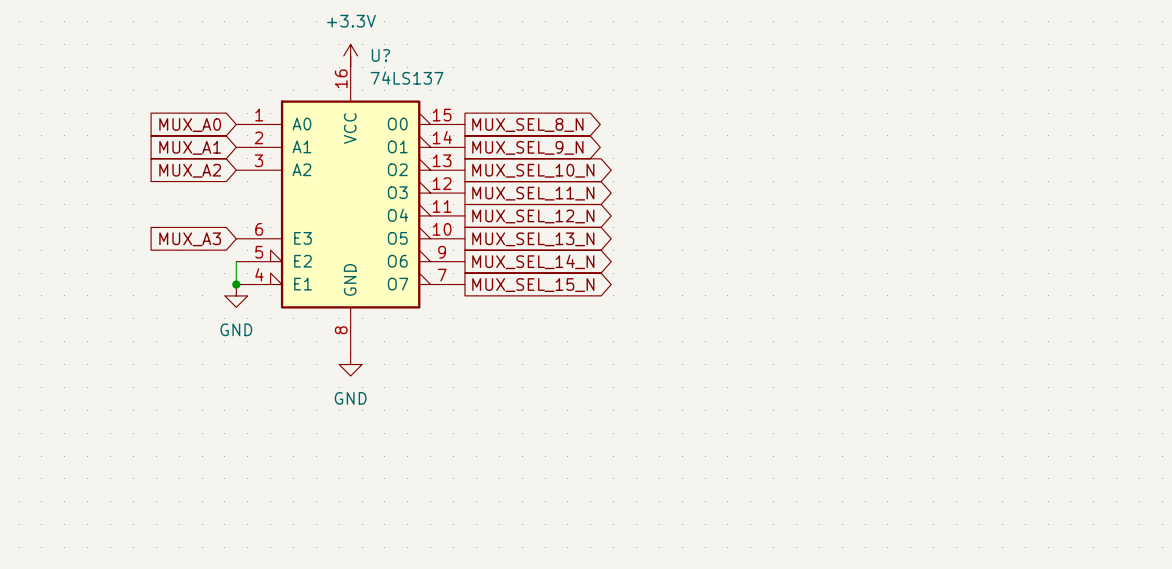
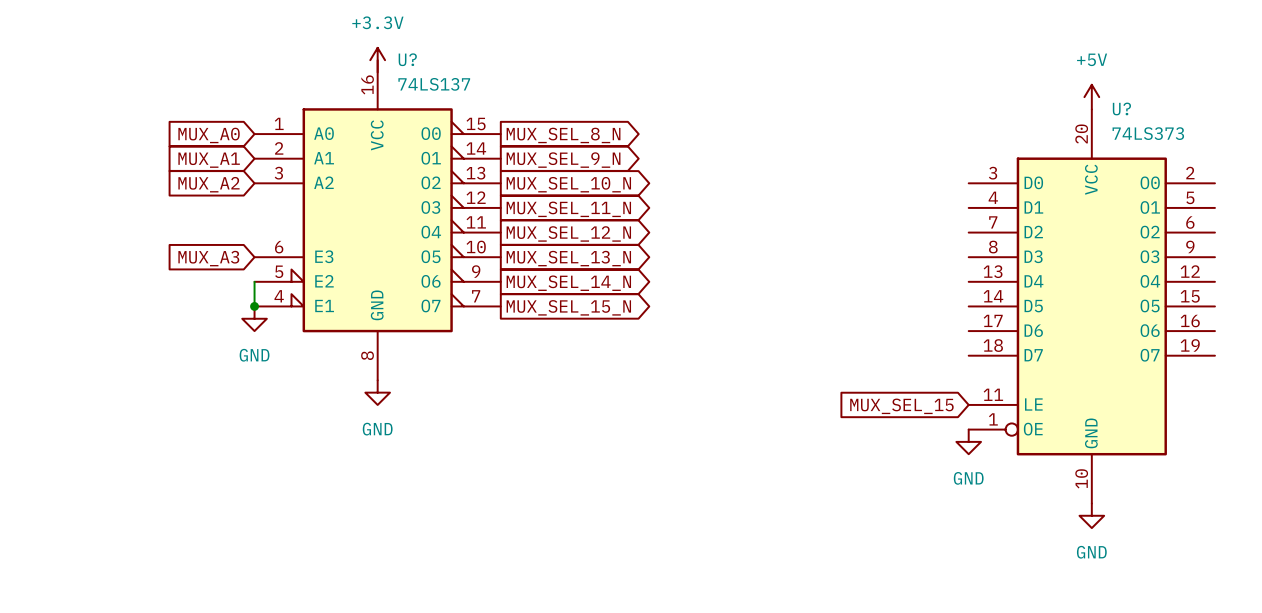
power symbol: none -> +5V (1091, 97)
U?: none -> 74LS373 (1091, 306)
global label: none -> MUX_SEL_15 (901, 406)
power symbol: none -> GND (968, 441)
power symbol: none -> GND (1091, 515)

